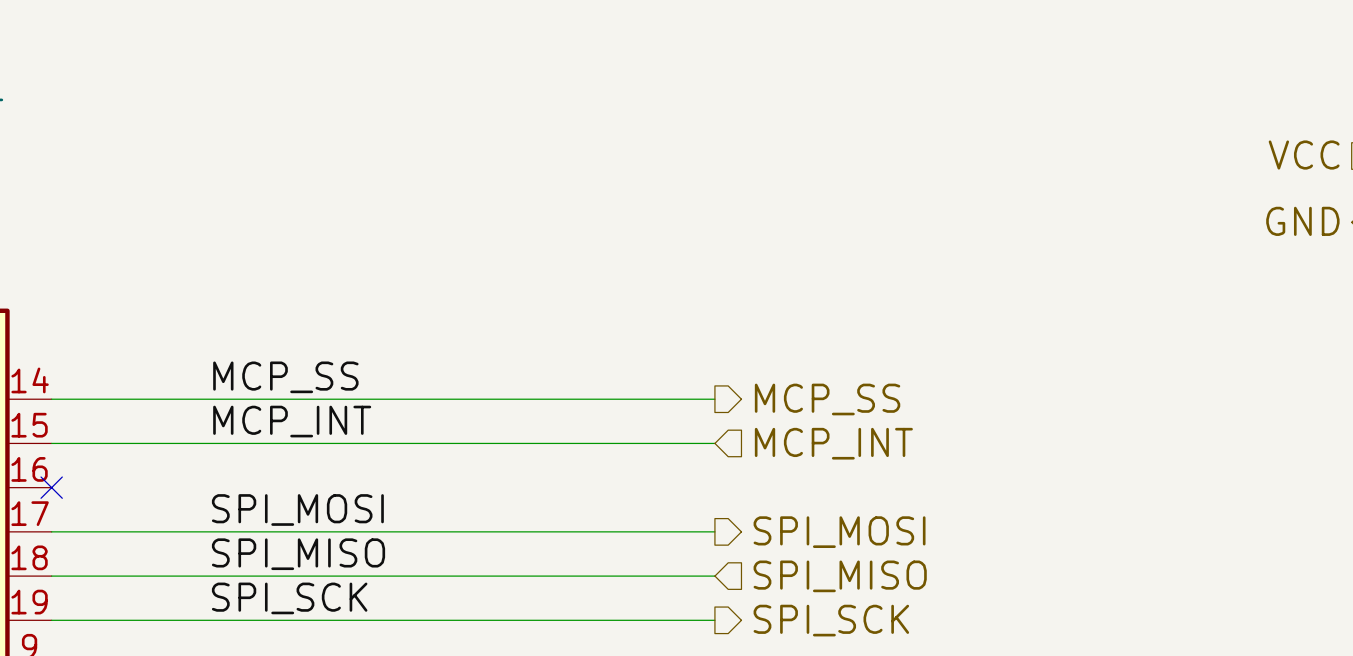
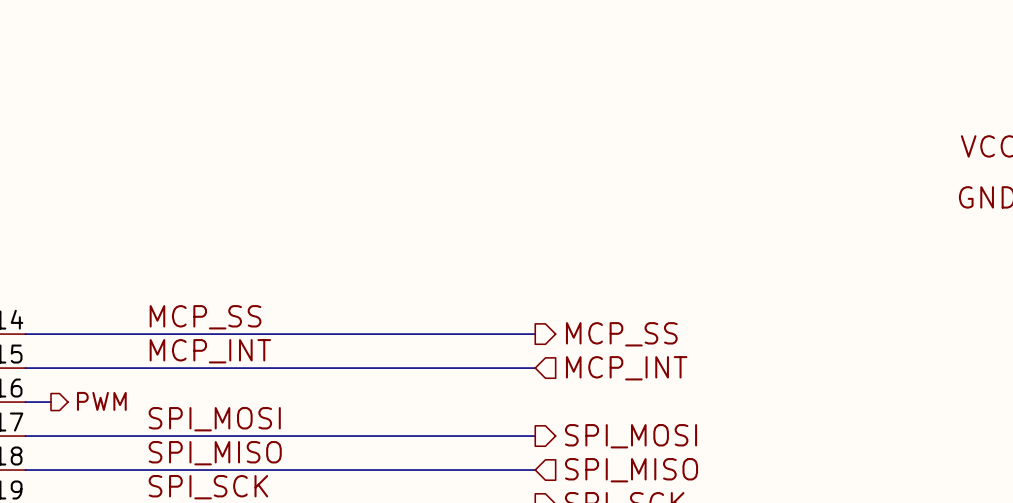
hierarchical label: none -> PWM (101, 401)
wire: none -> (25, 402) (51, 402)
no-connect mark: (51, 487) -> none

